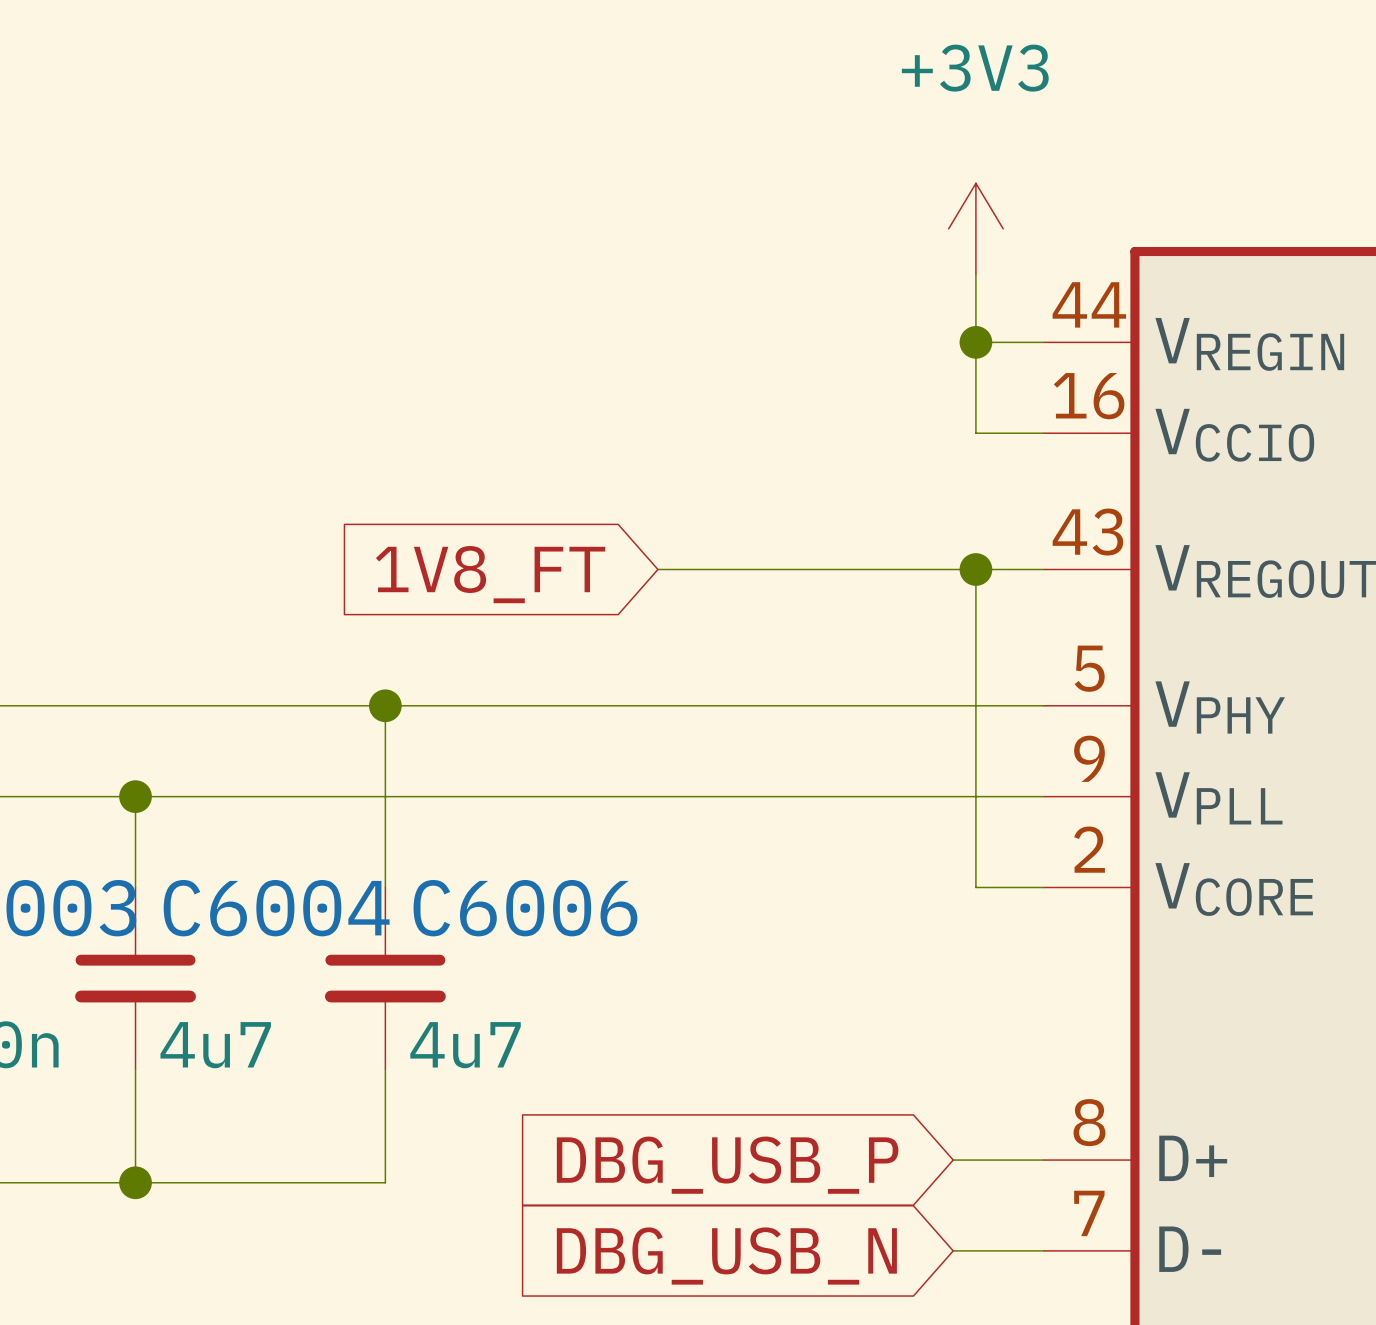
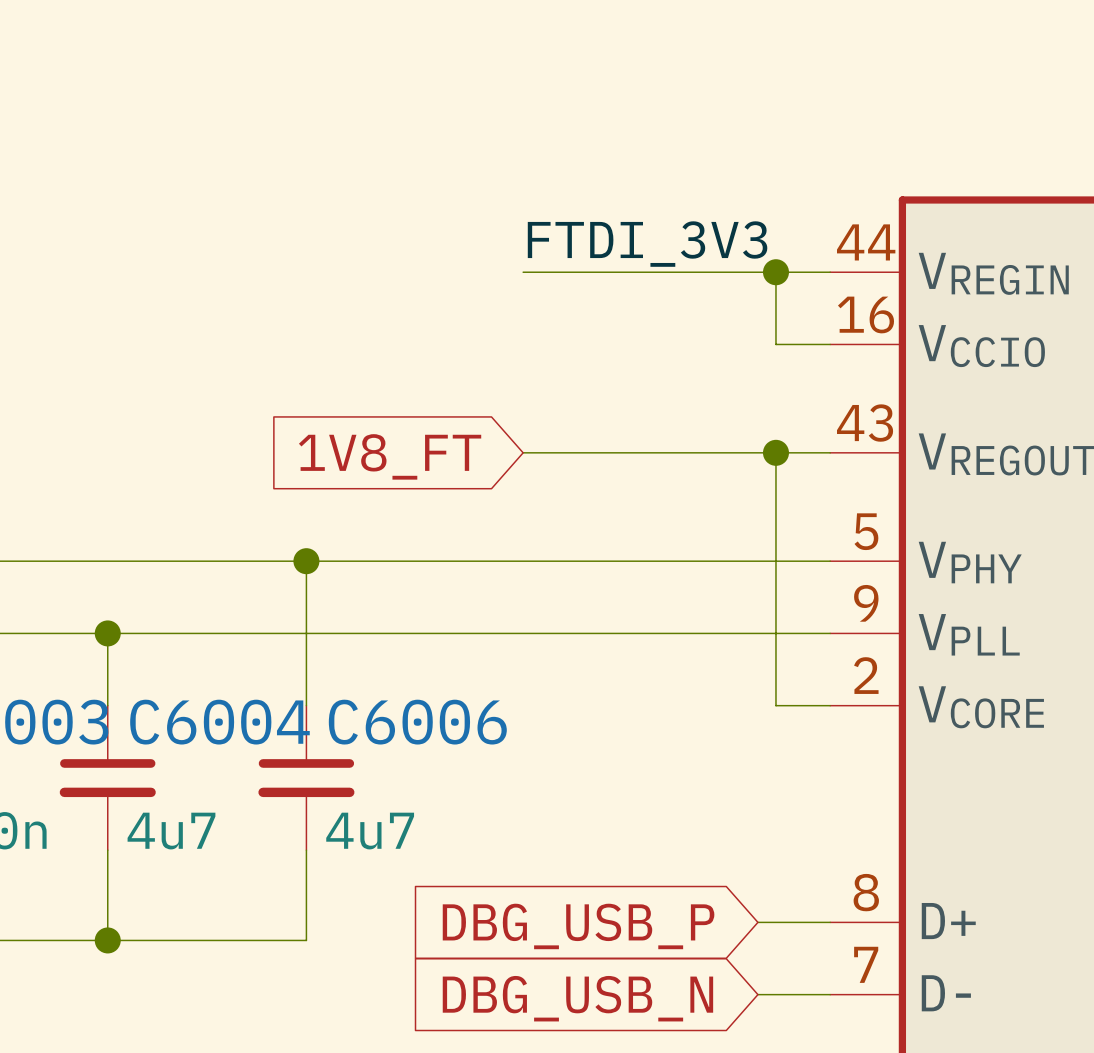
power symbol: +3V3 (975, 228) -> none
wire: (975, 274) (975, 342) -> (523, 272) (775, 272)
label: none -> FTDI_3V3 (647, 244)

